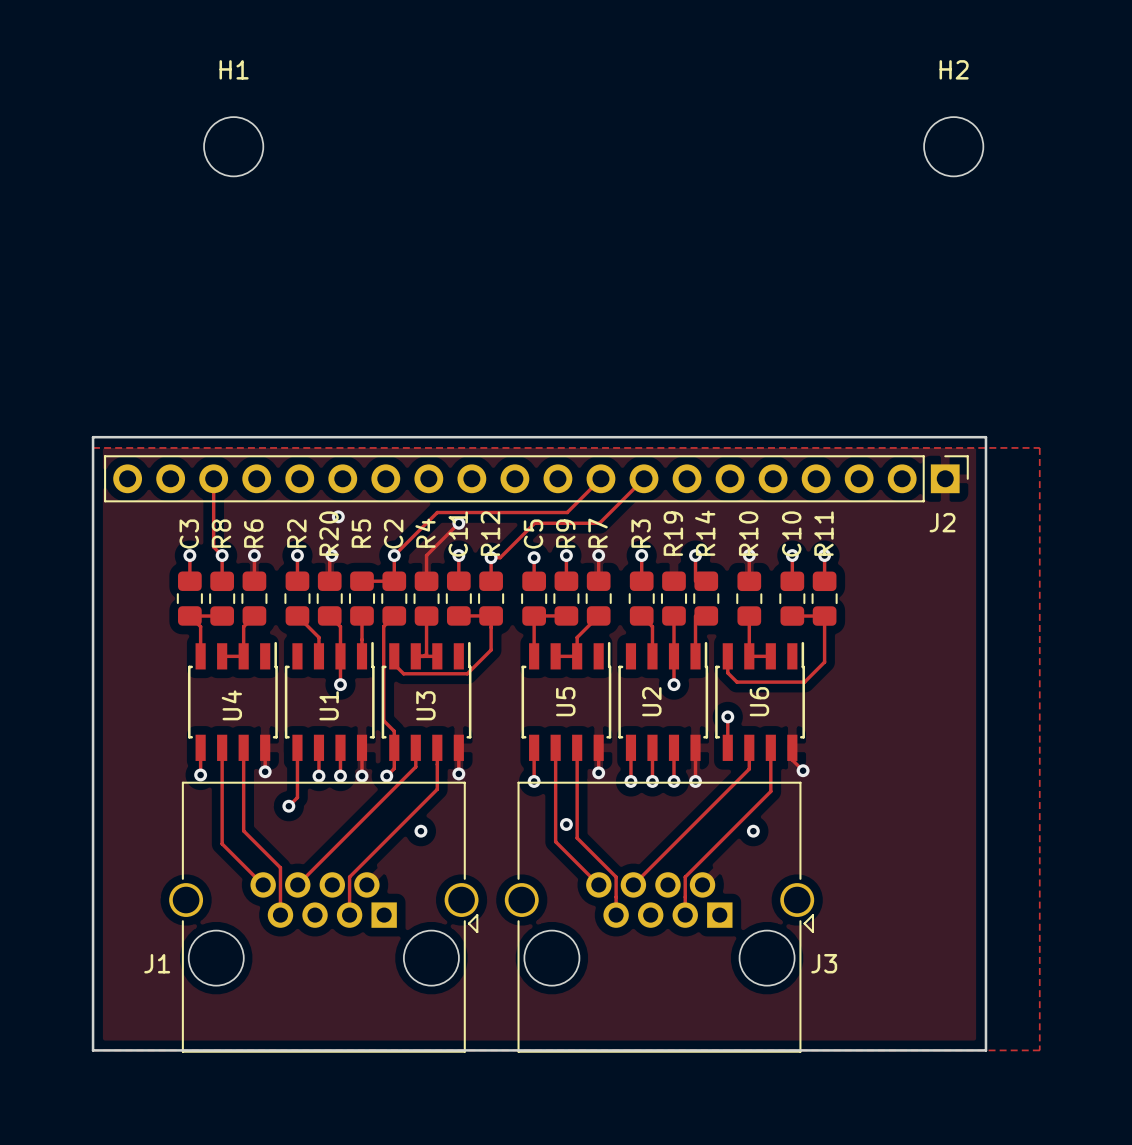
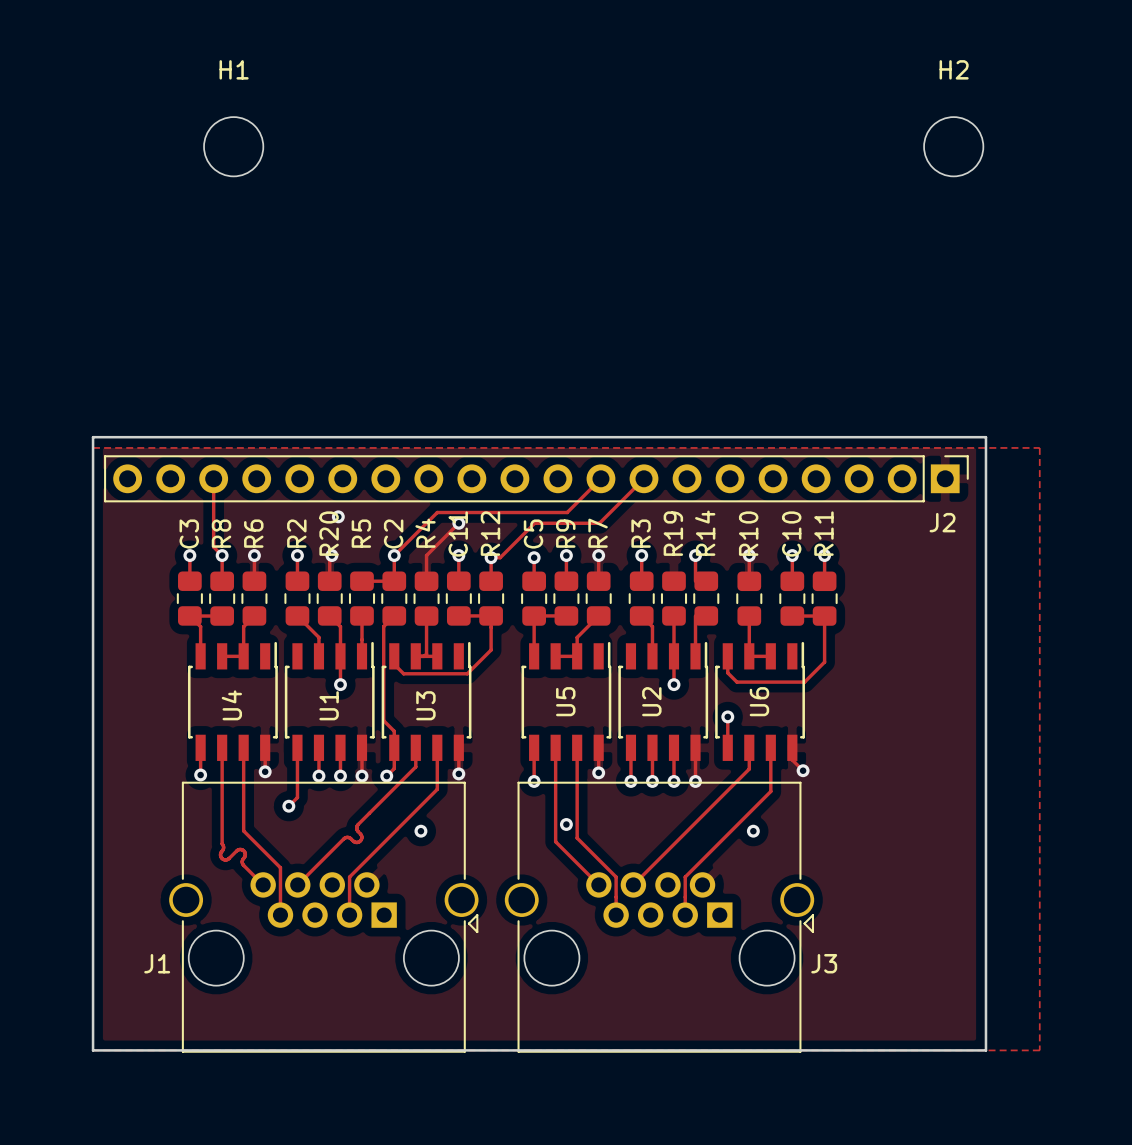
track: (358, 824) (343, 838) -> (358, 824) (356, 828) (361, 835) (360, 841) (355, 842) (348, 837) (343, 838)
track: (222, 843) (243, 865) -> (222, 843) (222, 851)
track: none -> (221, 851) (220, 856) (226, 859) (237, 850) (241, 849) (245, 853) (243, 858)
track: none -> (243, 858) (243, 865)

